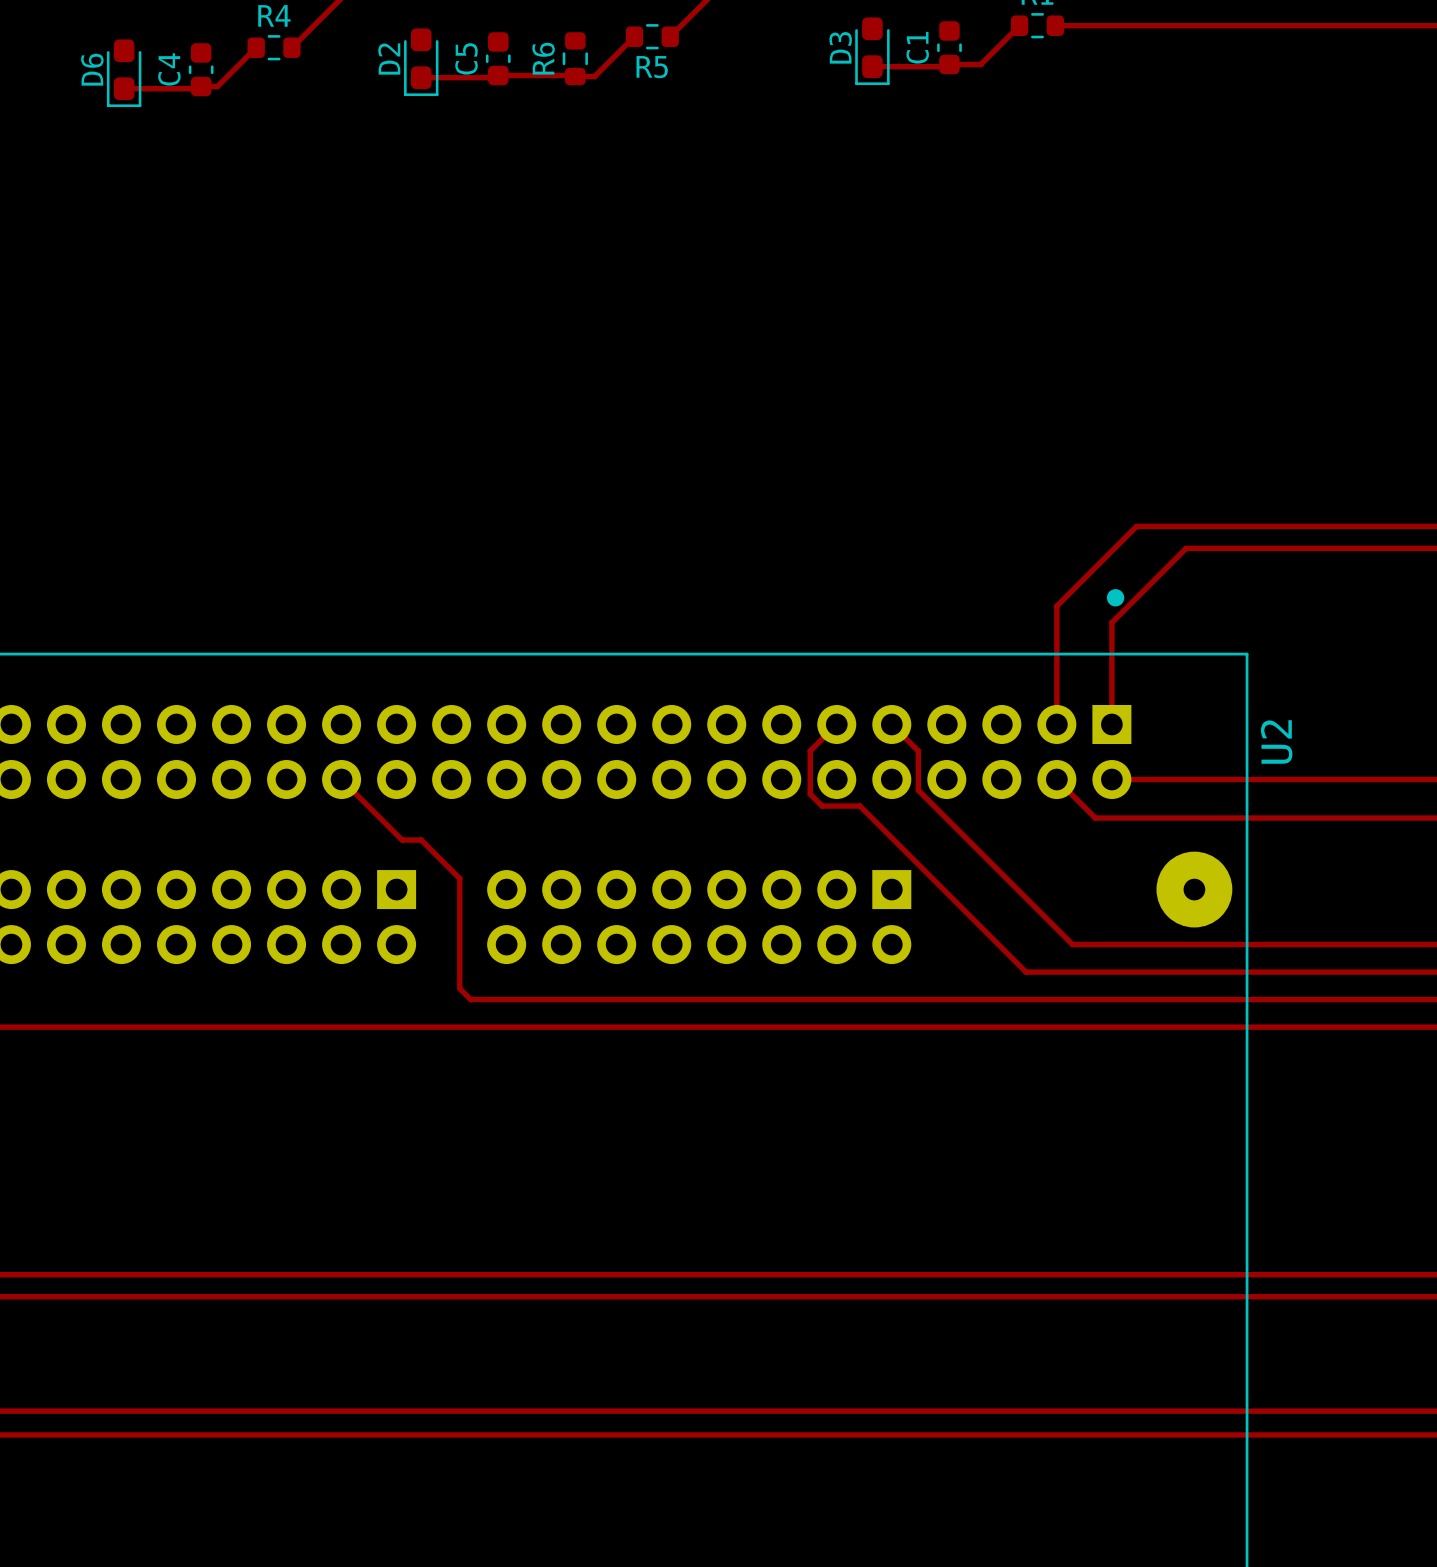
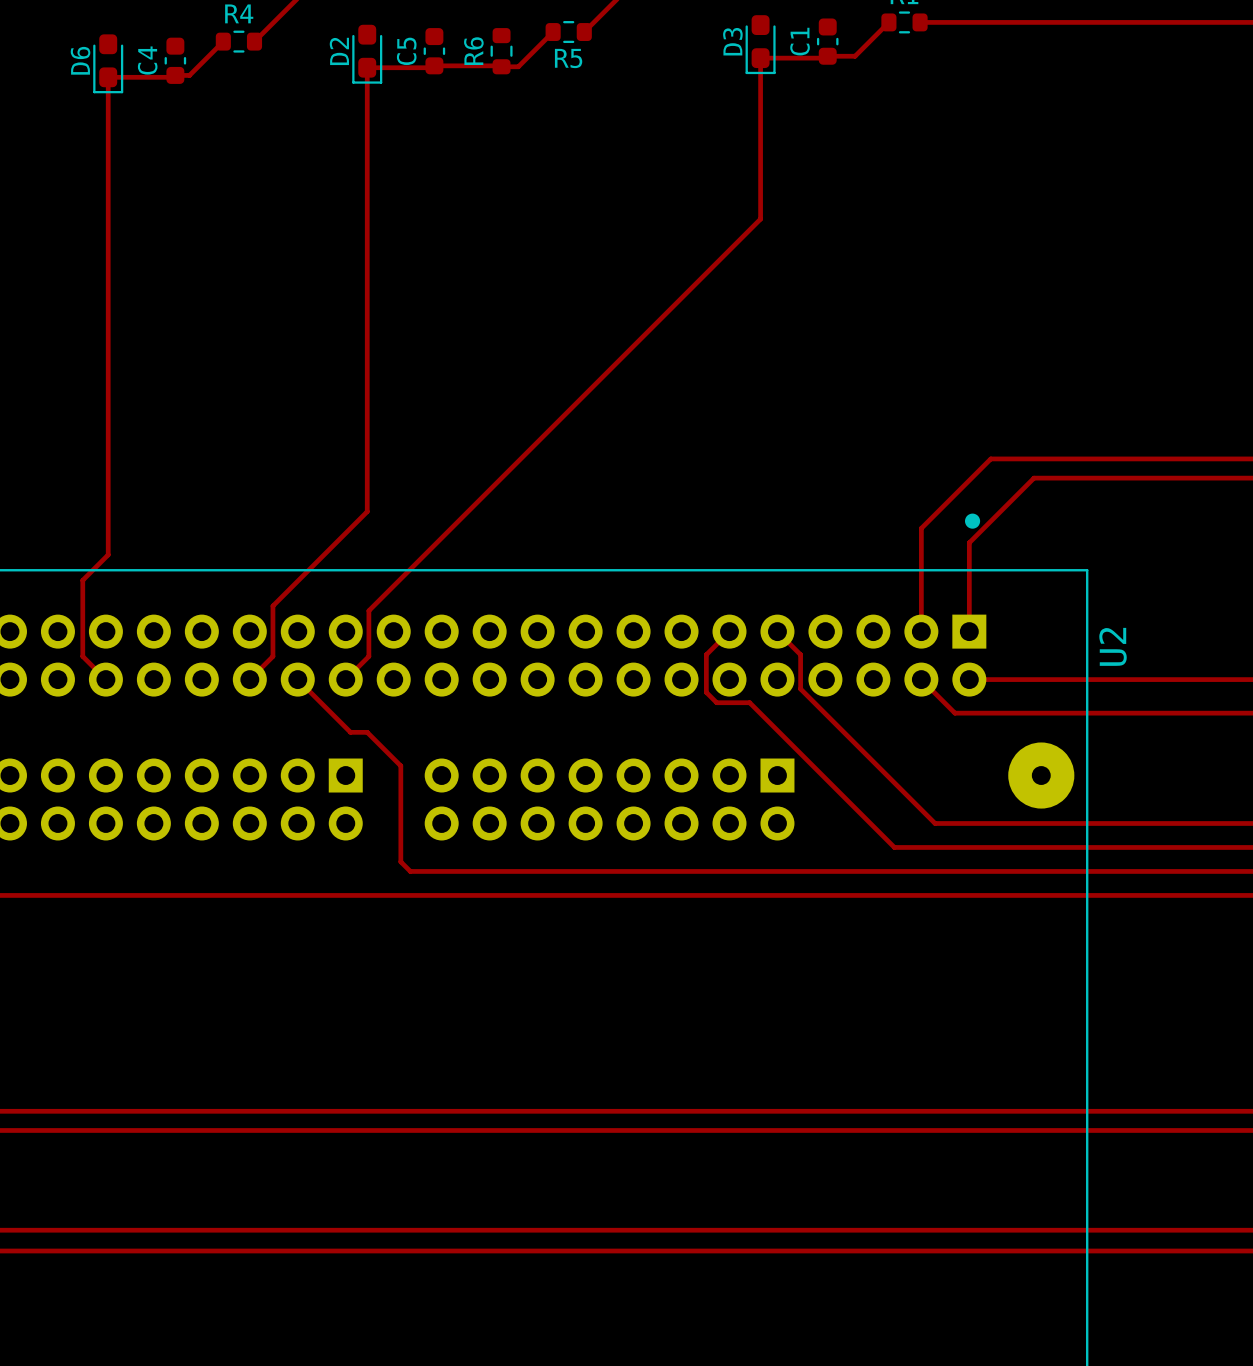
top track: none -> (760, 58) (760, 219) (368, 610) (368, 656) (345, 679)
top track: none -> (367, 67) (367, 511) (272, 605) (272, 656) (249, 679)
top track: none -> (108, 77) (108, 554) (82, 580) (82, 656) (105, 679)

